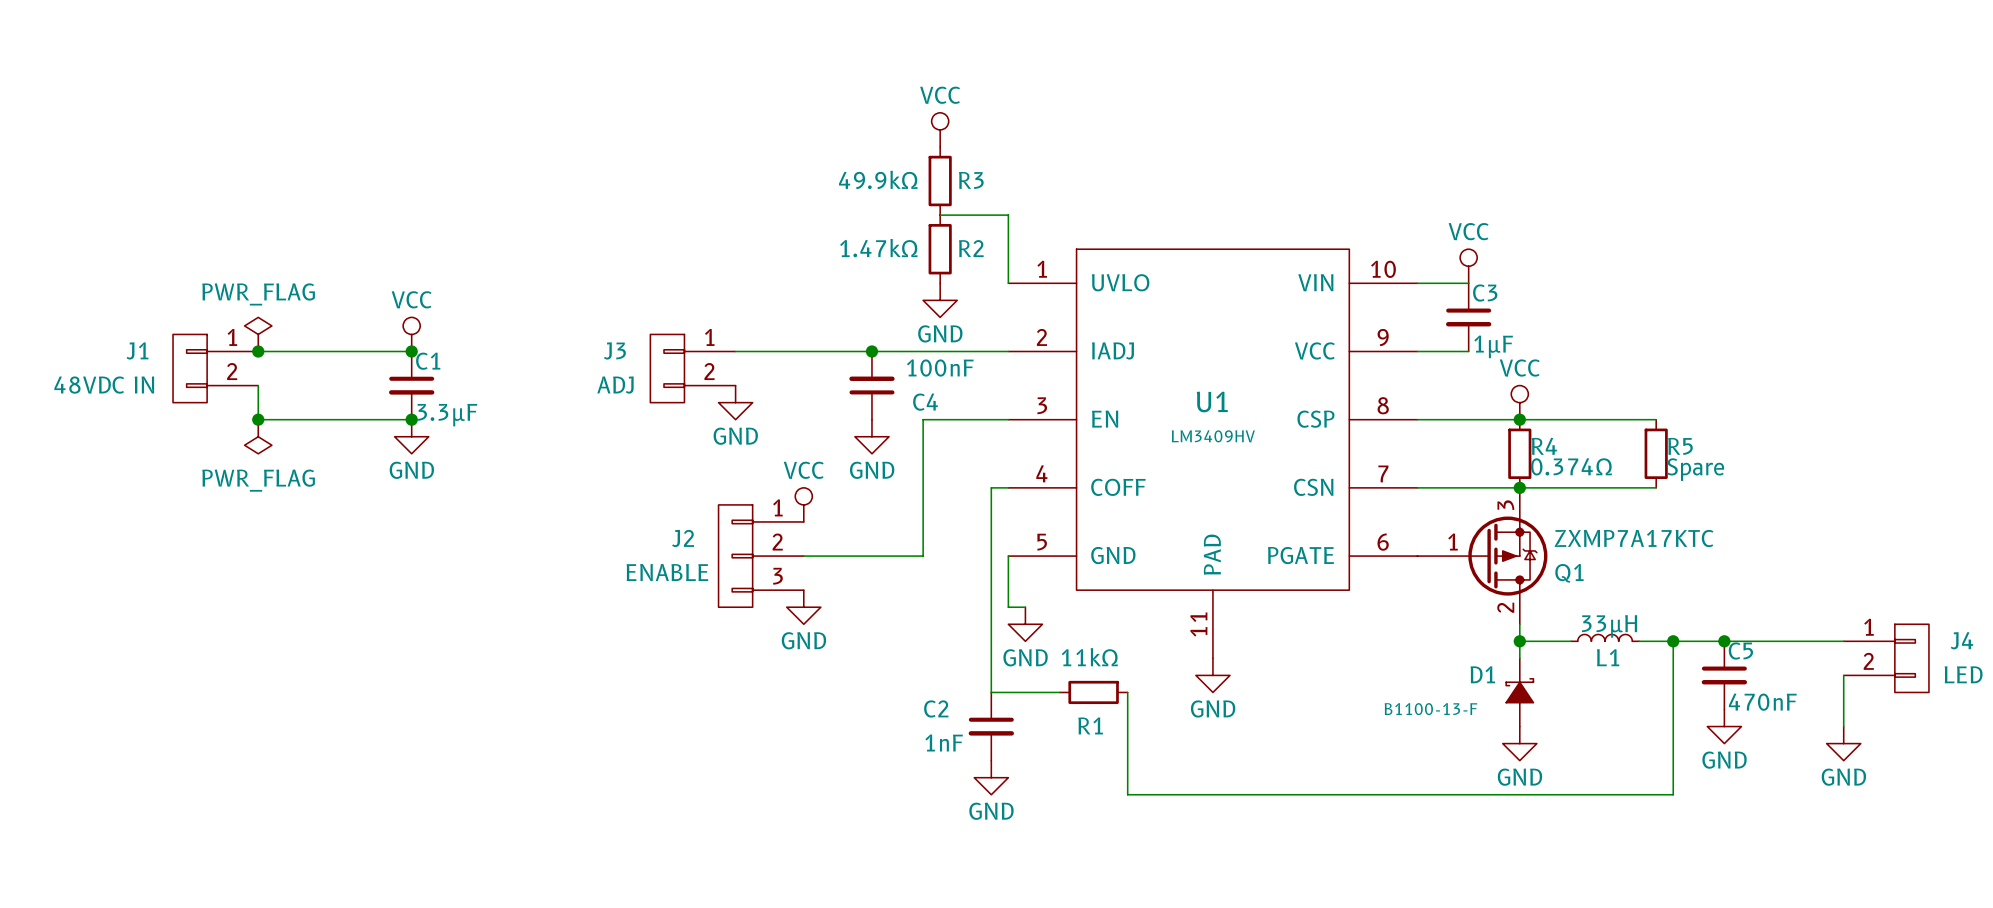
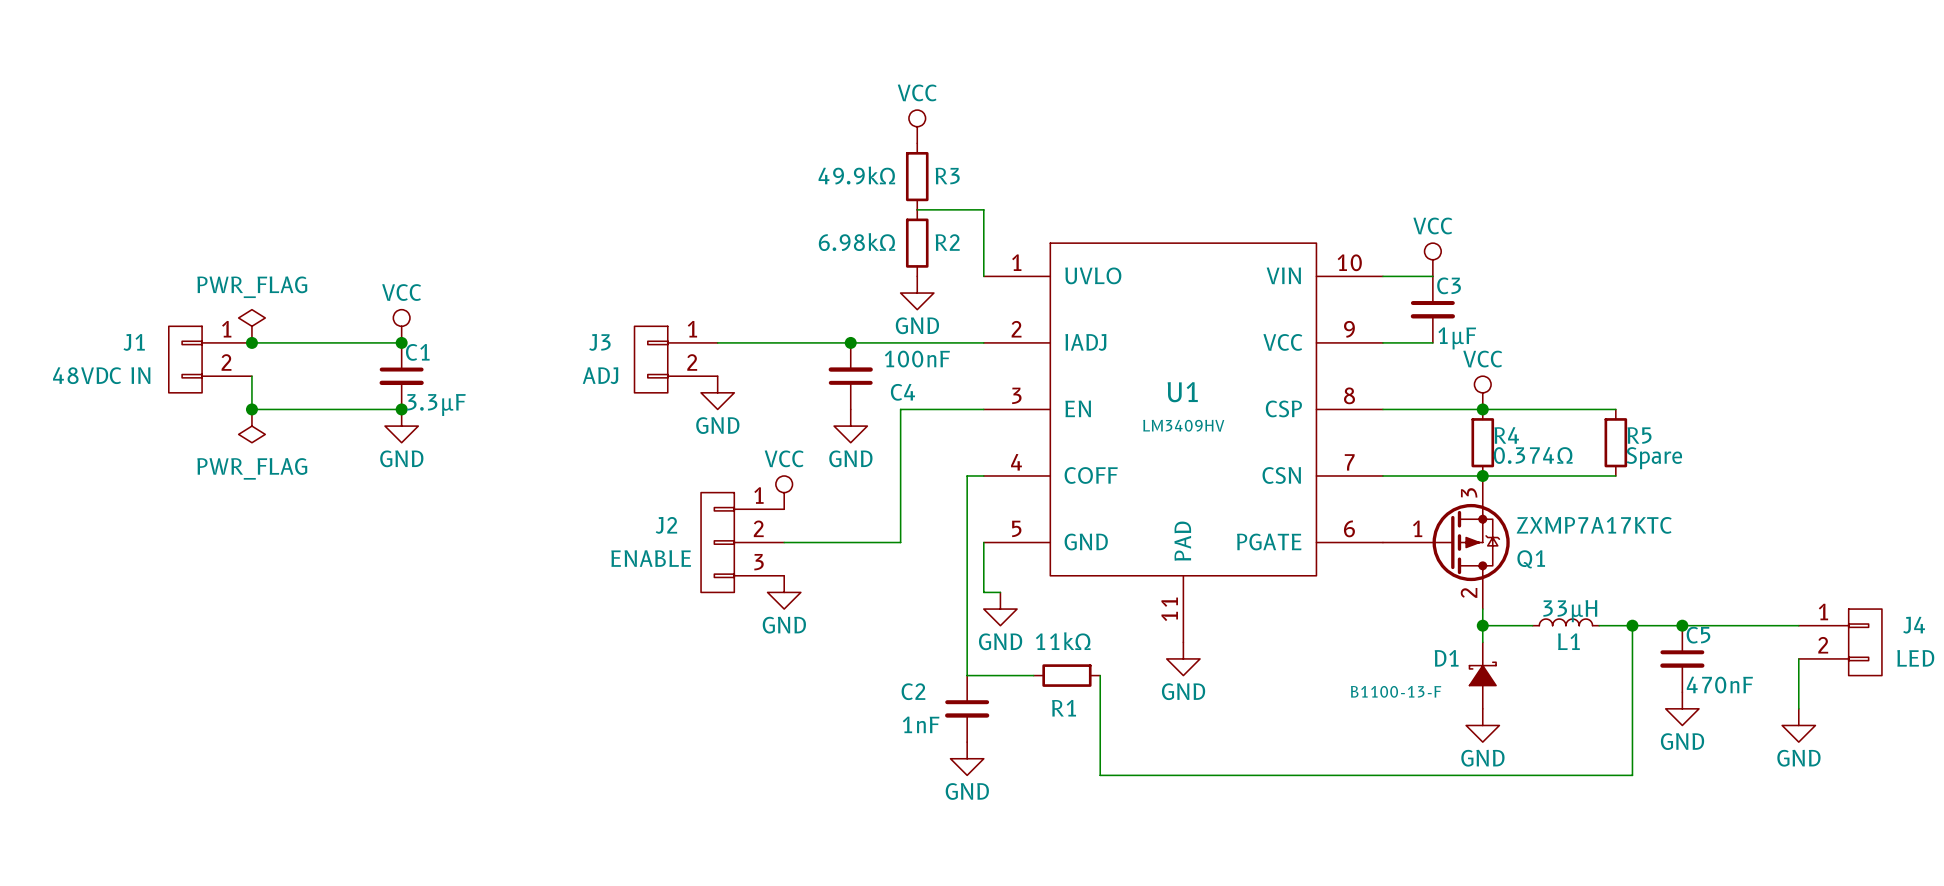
R2 value: 1.47kΩ (878, 248) -> 6.98kΩ (856, 242)

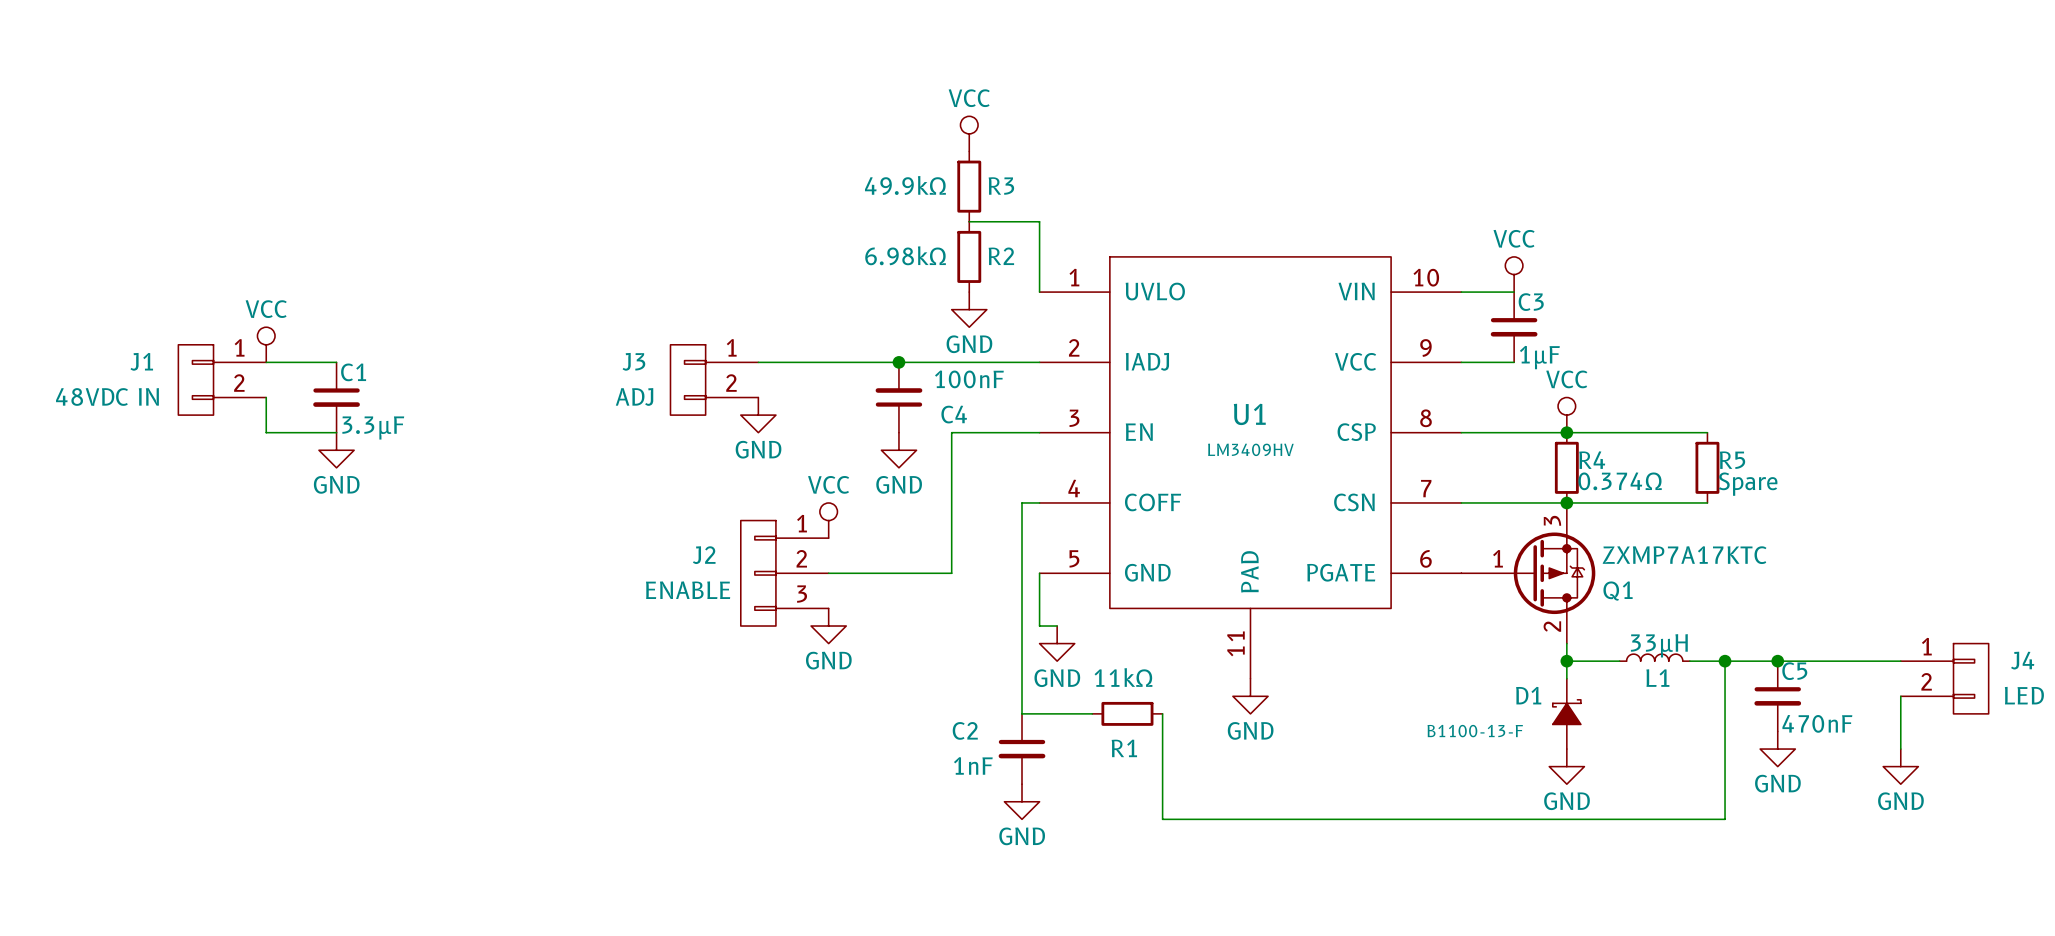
power symbol: PWR_FLAG (251, 326) -> VCC (266, 344)
power symbol: VCC (401, 326) -> none
junction: (251, 342) -> none
wire: (318, 342) (401, 342) -> none
junction: (401, 342) -> none
C1 position: (401, 376) -> (336, 397)
junction: (251, 409) -> none
wire: (318, 409) (401, 409) -> none
junction: (401, 409) -> none
power symbol: PWR_FLAG (251, 426) -> none
power symbol position: GND (401, 426) -> GND (336, 450)

